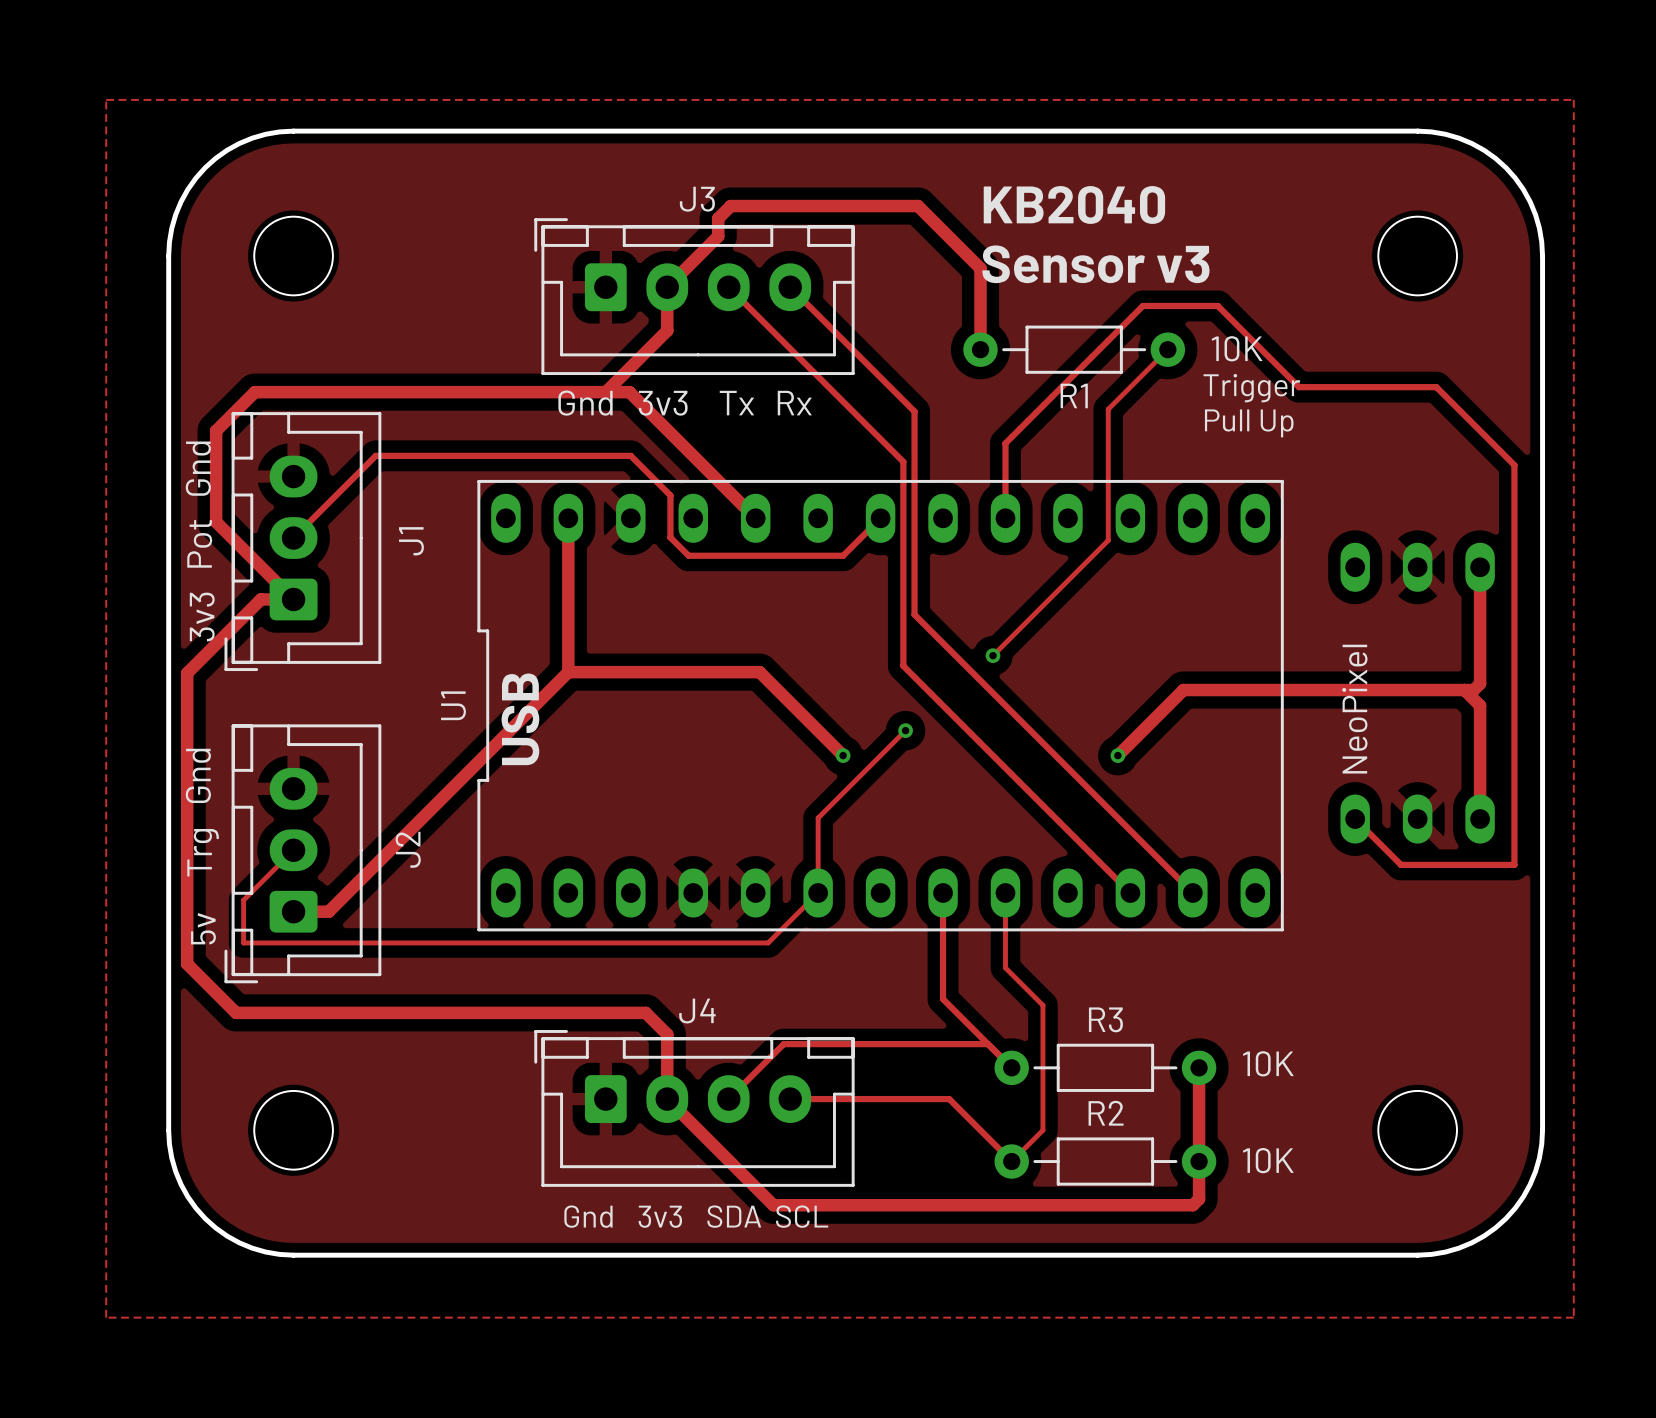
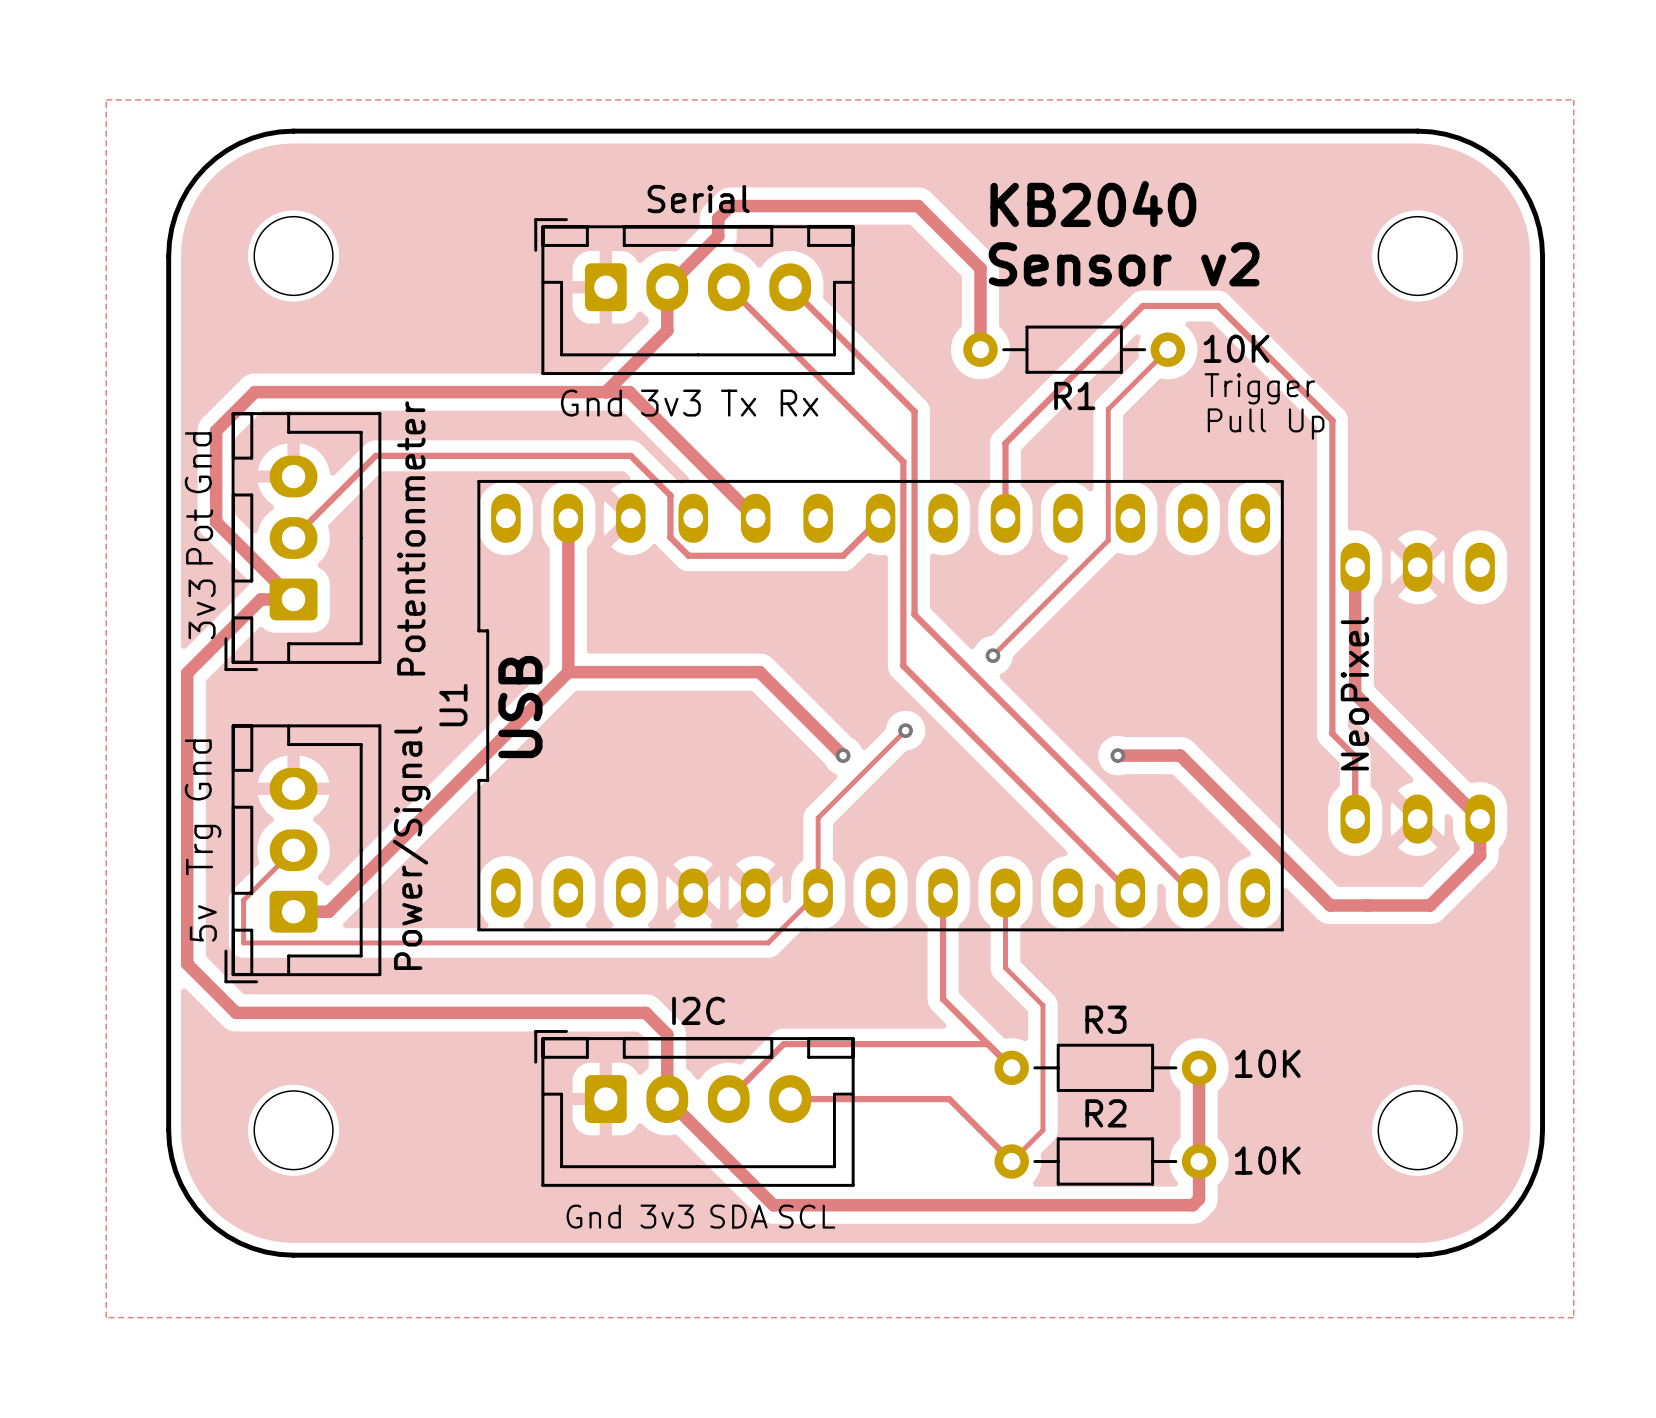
J3 name: J3 (697, 199) -> Serial (698, 199)
text: Sensor v3 (1095, 264) -> Sensor v2 (1124, 264)
track: (1299, 387) (1436, 387) (1514, 465) (1514, 864) (1401, 864) (1355, 819) -> (1299, 387) (1332, 420) (1332, 733) (1355, 756) (1355, 819)
J1 name: J1 (411, 541) -> Potentionmeter (411, 538)
track: (1480, 567) (1480, 683) (1473, 690) (1183, 690) (1117, 755) -> (1355, 567) (1355, 694) (1480, 819) (1480, 855) (1430, 905) (1330, 905) (1180, 755) (1117, 755)
track: (1464, 690) (1480, 705) (1480, 819) -> none
J2 name: J2 (408, 849) -> Power/Signal (411, 848)
J4 name: J4 (697, 1011) -> I2C (698, 1010)

